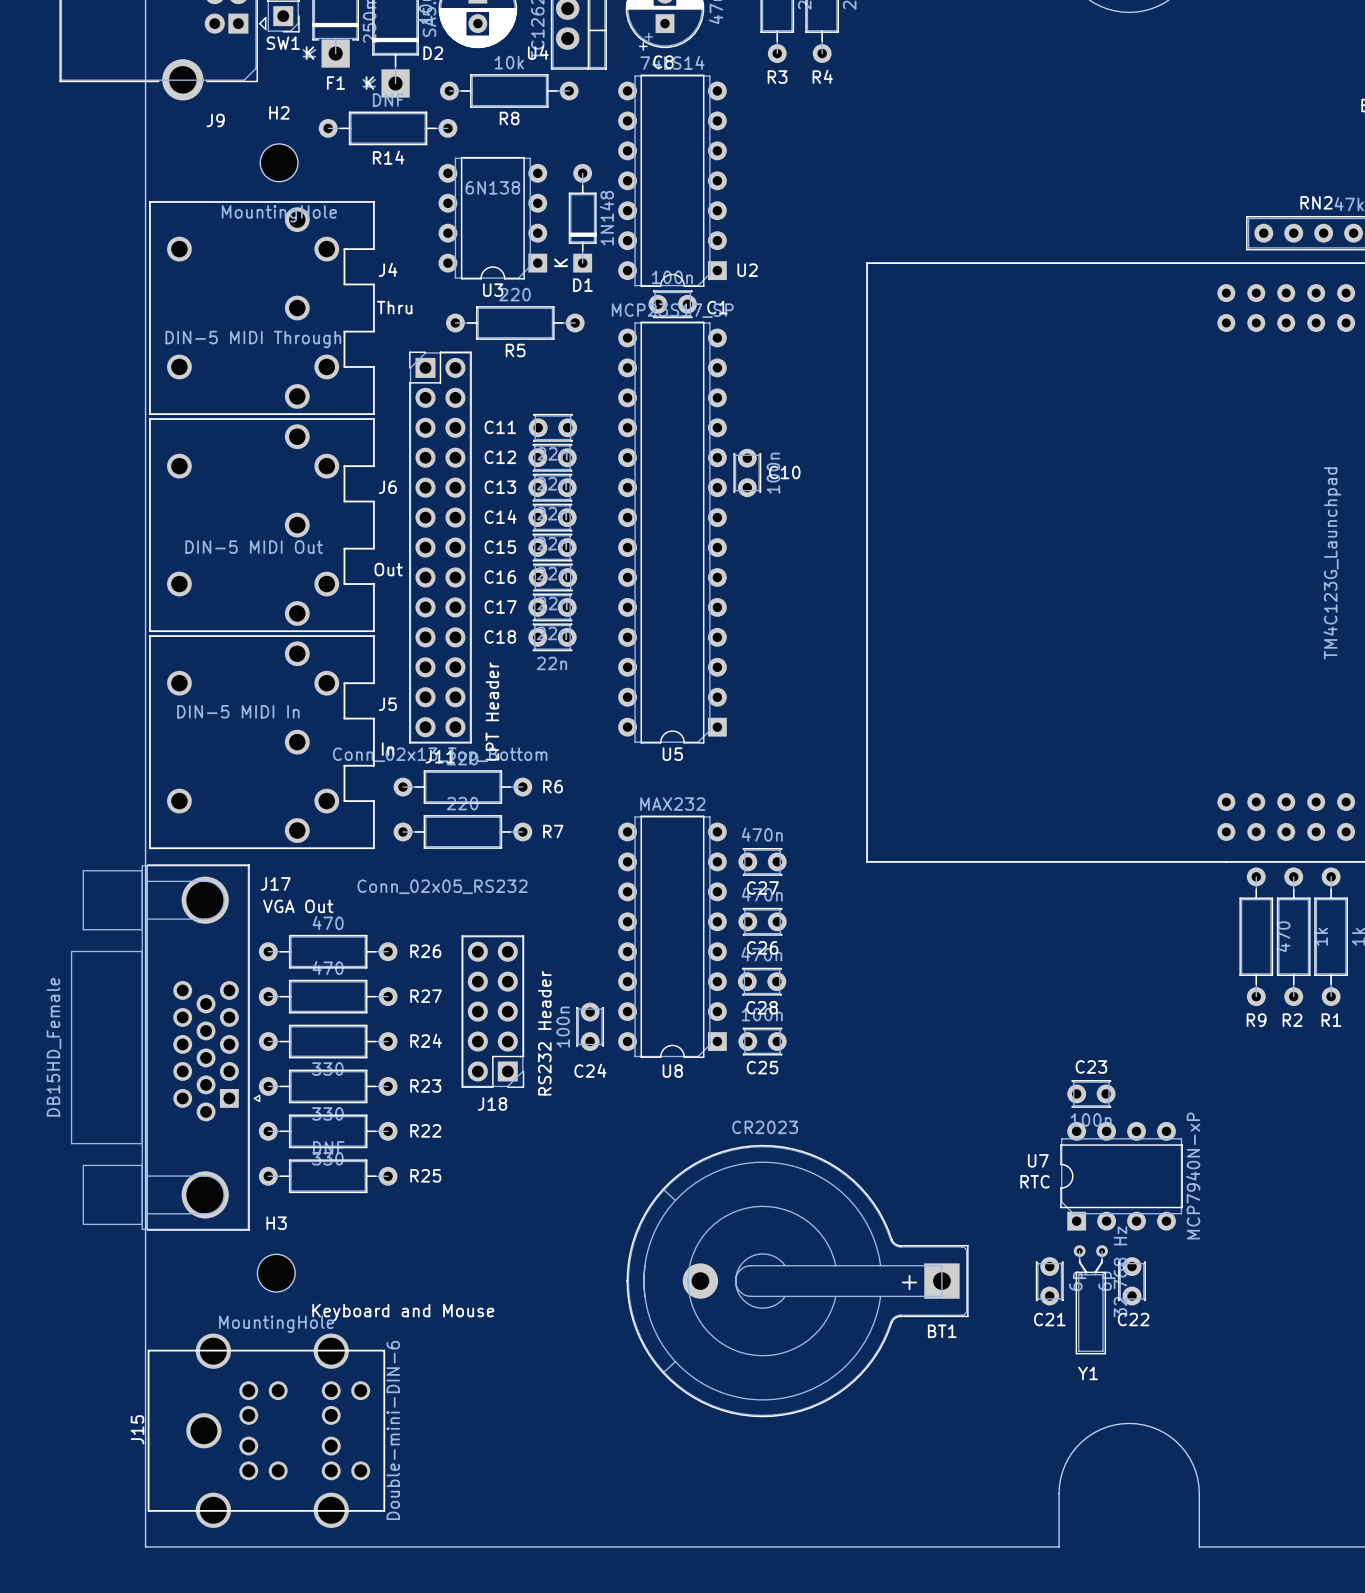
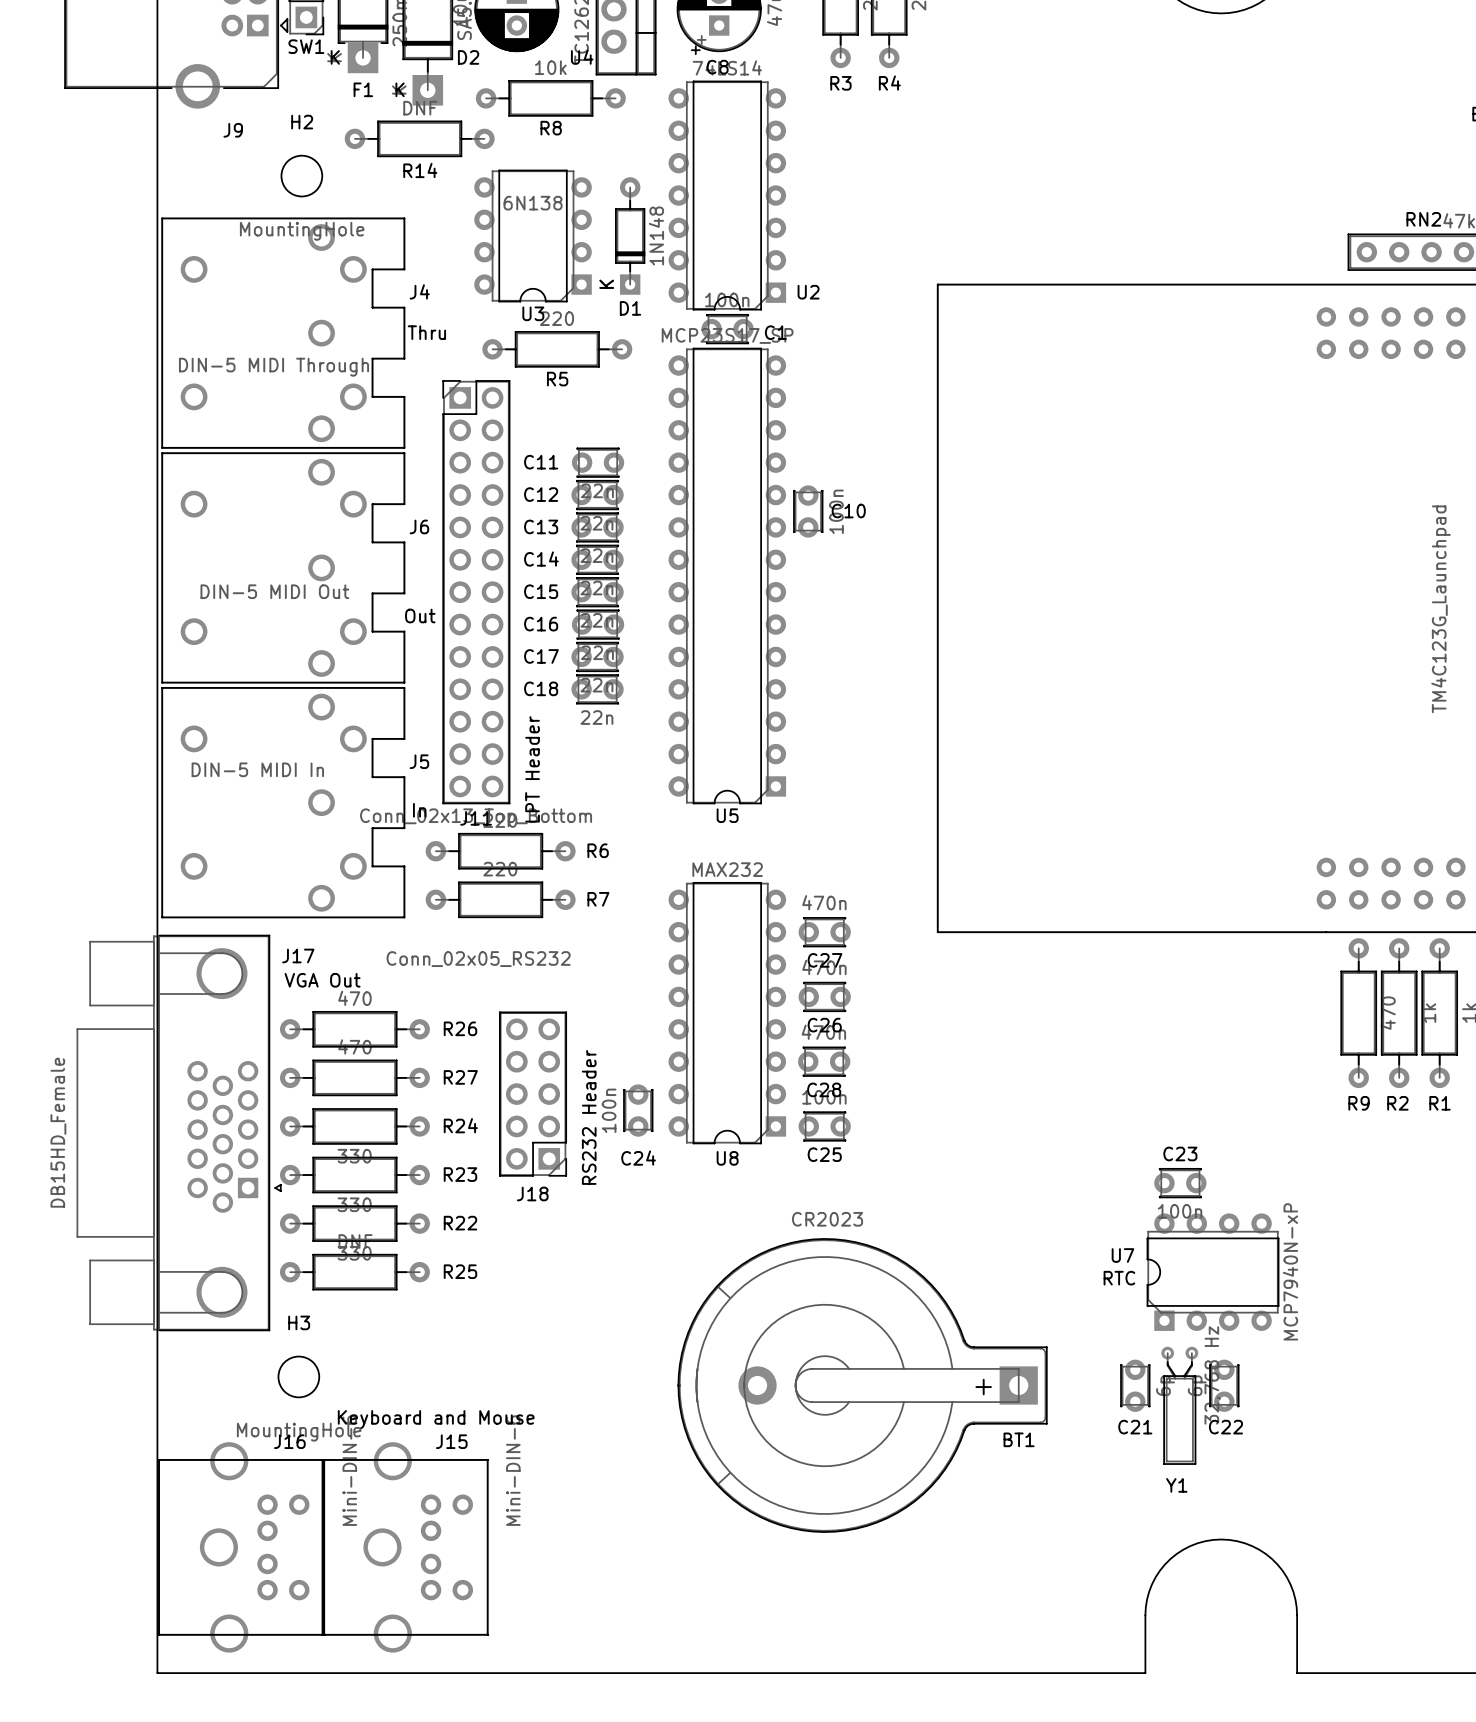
J15 footprint: [147, 1333, 386, 1528] -> [321, 1442, 490, 1653]
J15 name position: J15 (137, 1429) -> J15 (451, 1441)
J16: none -> Mini-DIN-6 (241, 1547)
J15 value: Double-mini-DIN-6 (393, 1430) -> Mini-DIN-6 (513, 1470)

